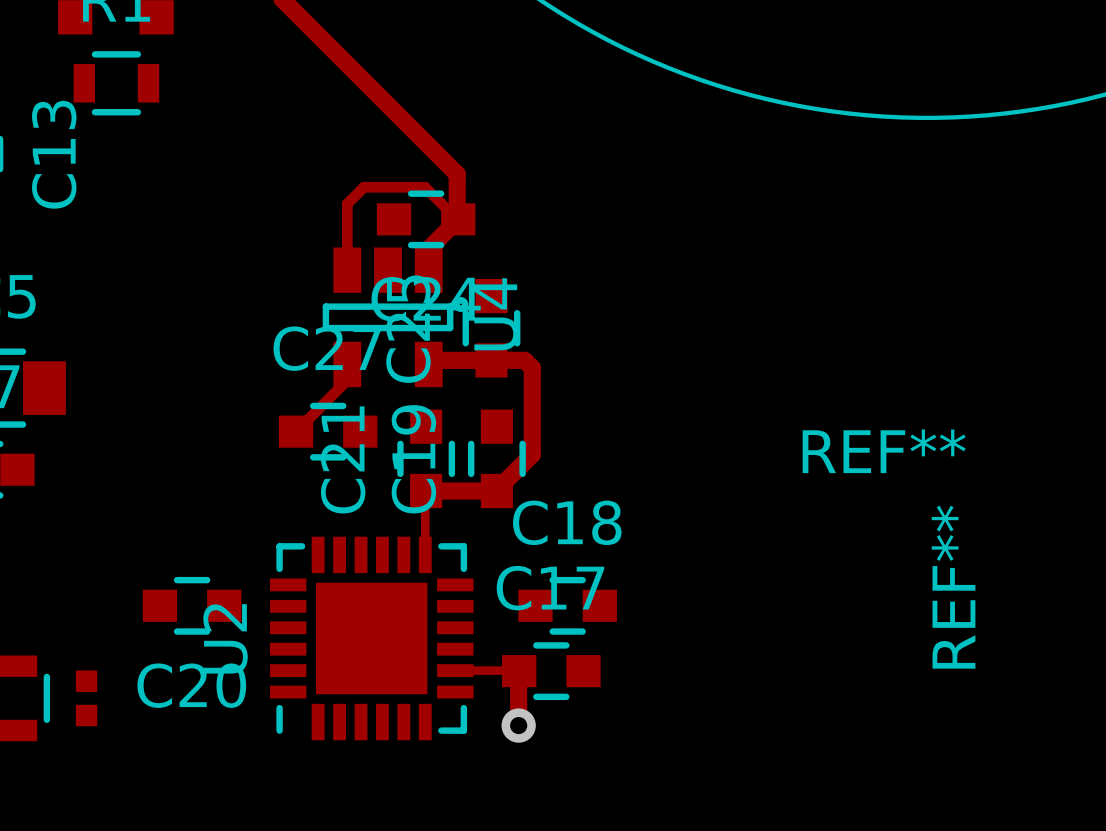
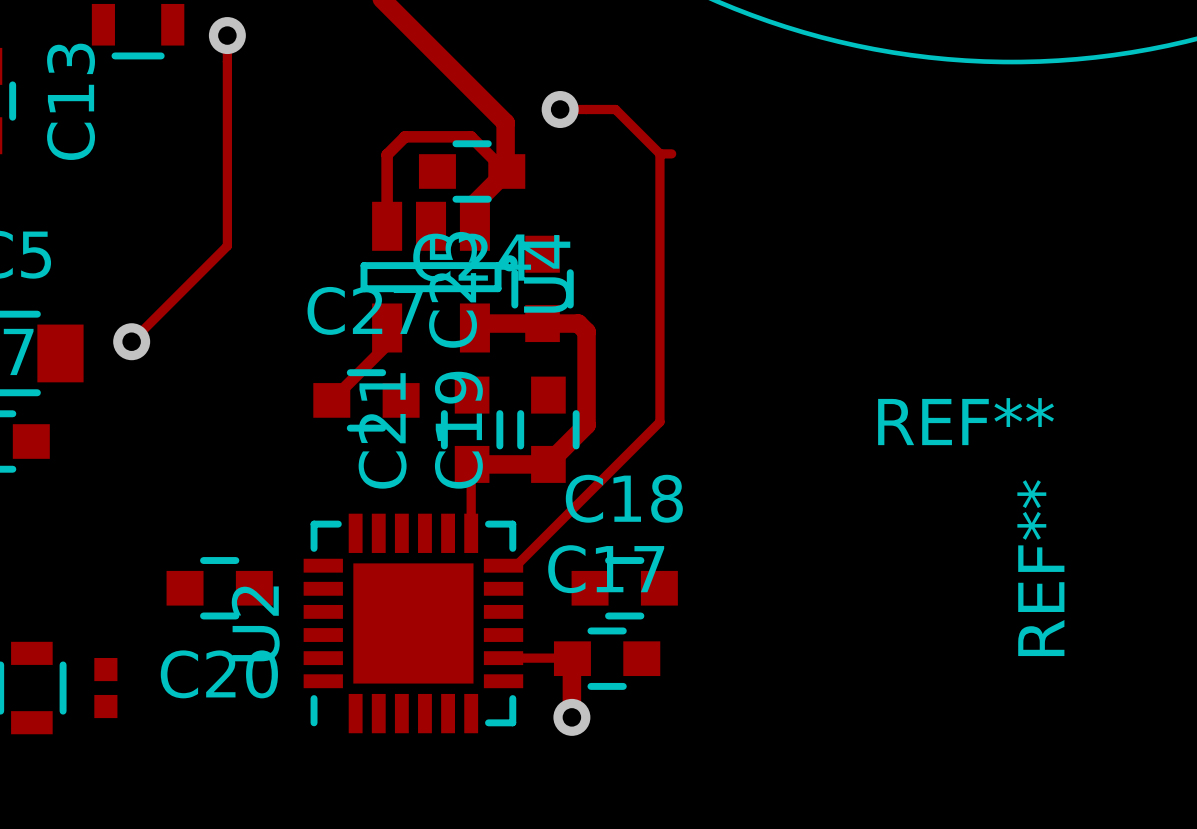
track: none -> (227, 35) (227, 245) (131, 341)
via: none -> (227, 35)
track: none -> (560, 109) (615, 109) (659, 153)
via: none -> (560, 109)
track: none -> (659, 153) (671, 153)
track: none -> (659, 153) (659, 422) (516, 565) (503, 565)
via: none -> (131, 341)

